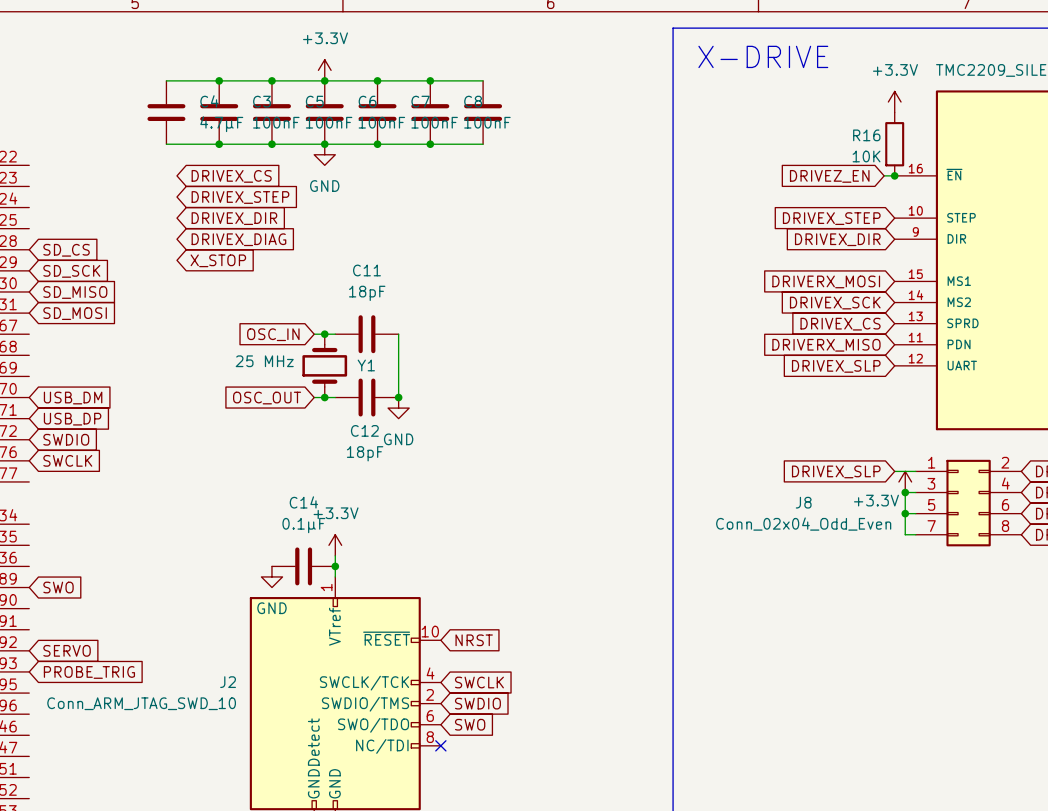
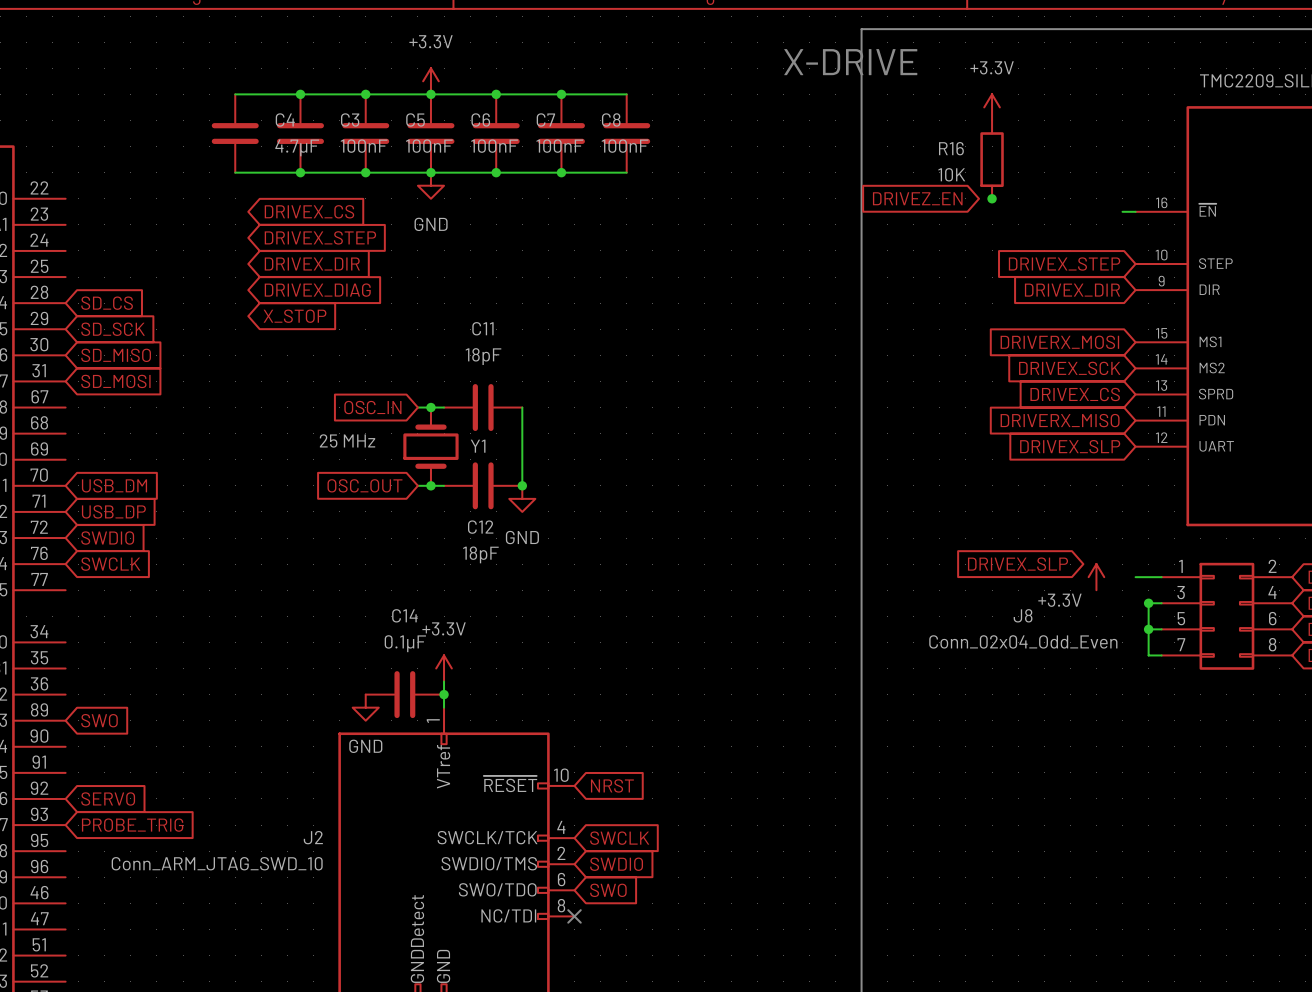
text position: X-DRIVE (763, 56) -> X-DRIVE (850, 62)
power symbol position: +3.3V (894, 102) -> +3.3V (992, 107)
R16 position: (894, 144) -> (992, 159)
junction: none -> (992, 198)
junction: (894, 175) -> none
global label position: DRIVEZ_EN (829, 176) -> DRIVEZ_EN (917, 198)
global label position: DRIVEX_SLP (836, 471) -> DRIVEX_SLP (1017, 564)
power symbol position: +3.3V (905, 481) -> +3.3V (1096, 577)

